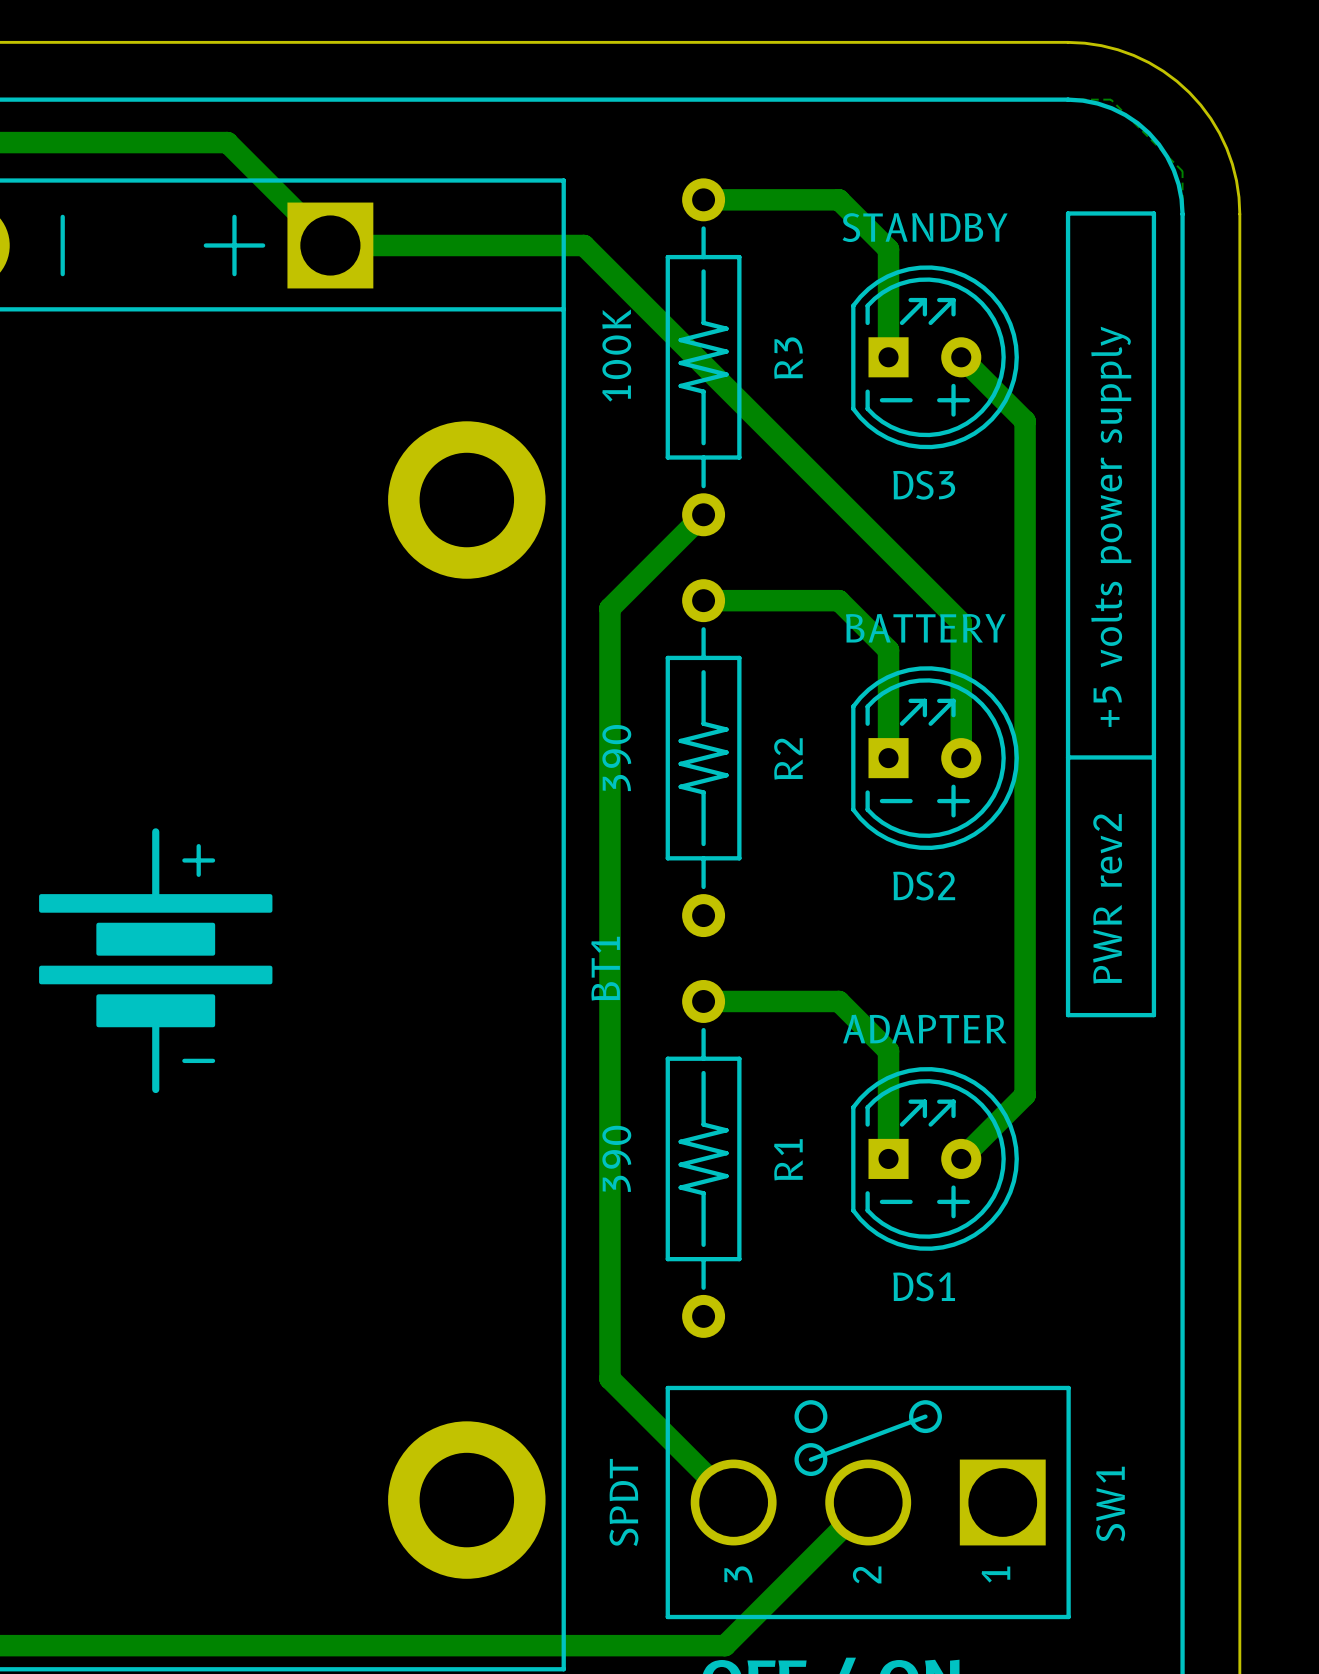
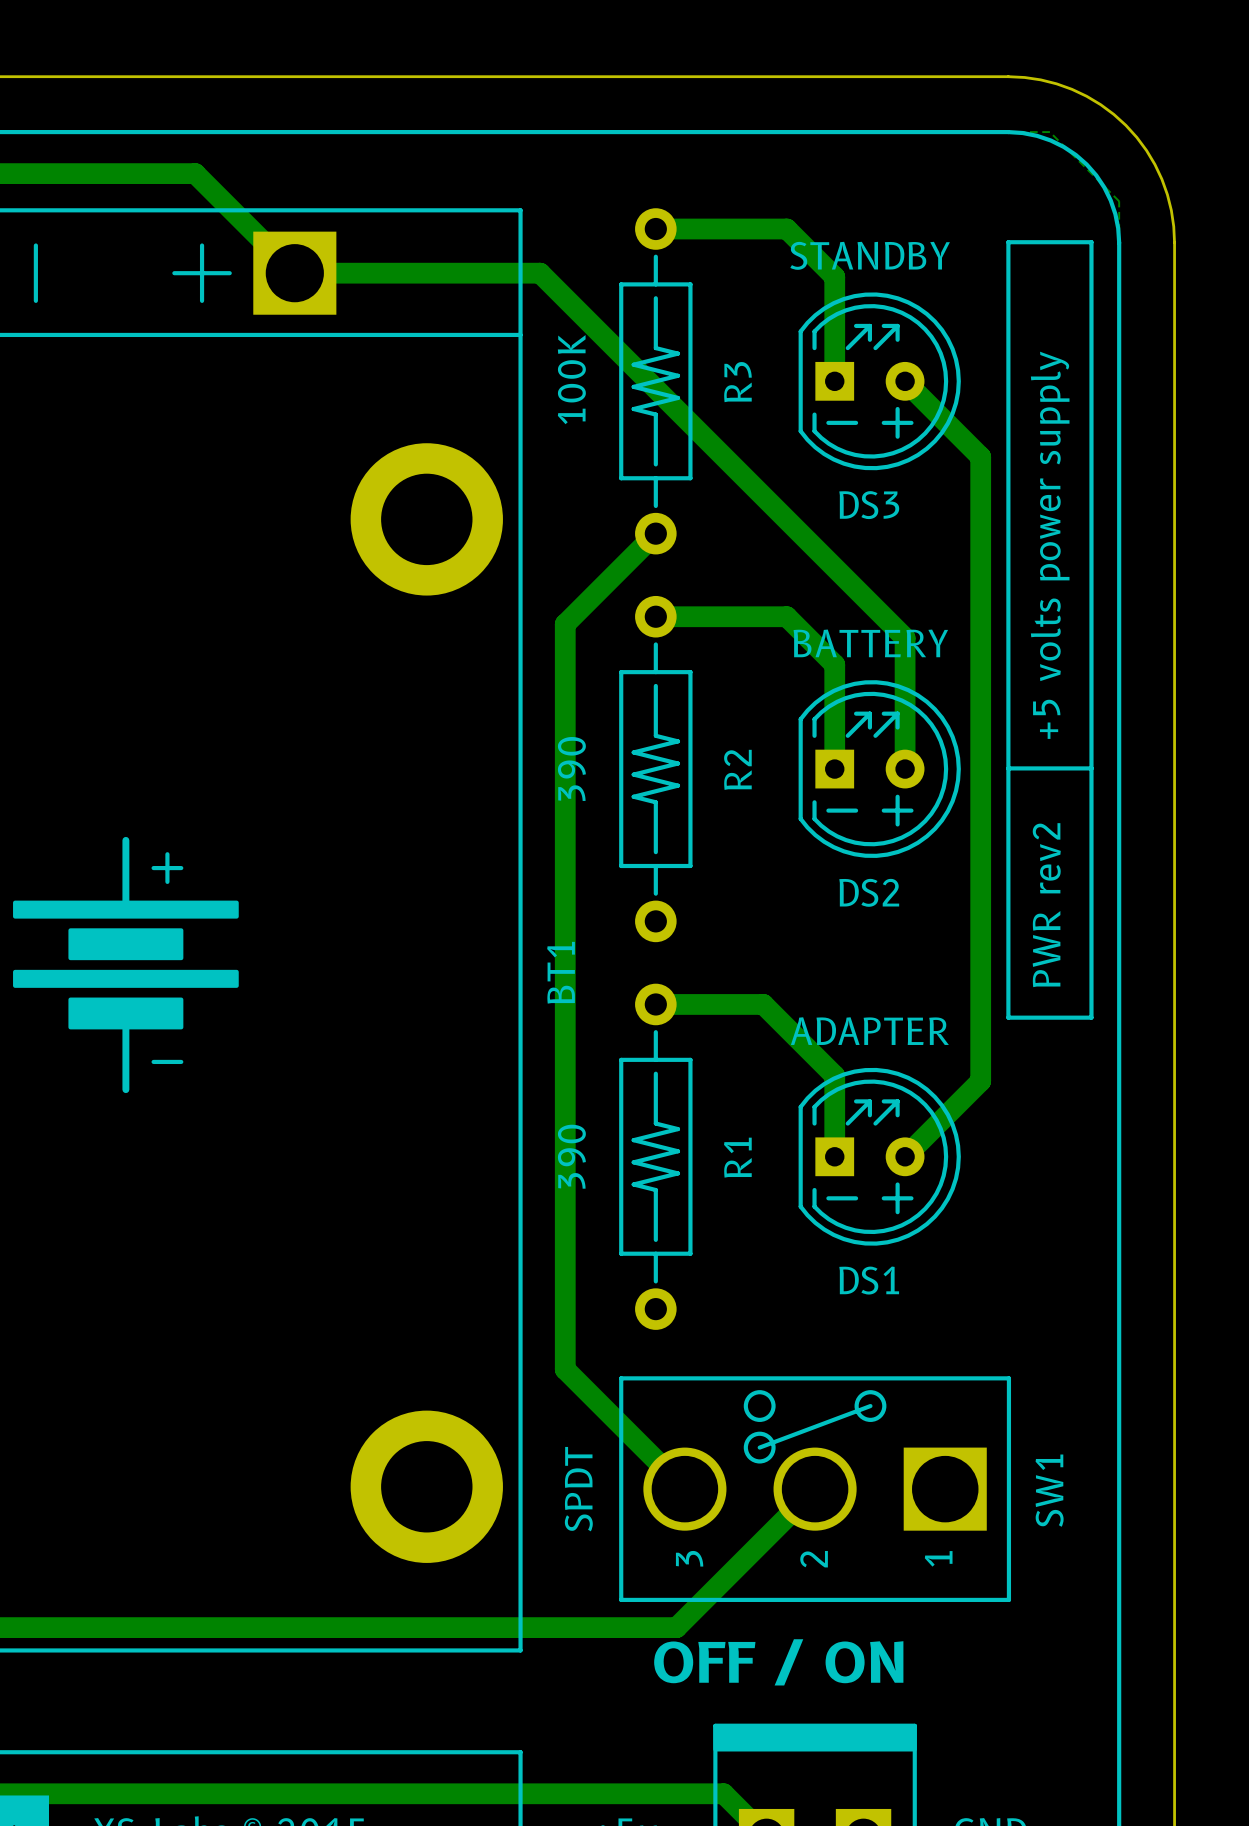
bottom track: (1025, 421) (1025, 1095) -> (966, 443) (980, 456) (980, 1081) (966, 1095)
bottom track: (814, 1001) (839, 1001) (888, 1051) (888, 1075) -> (763, 1004) (834, 1075)

